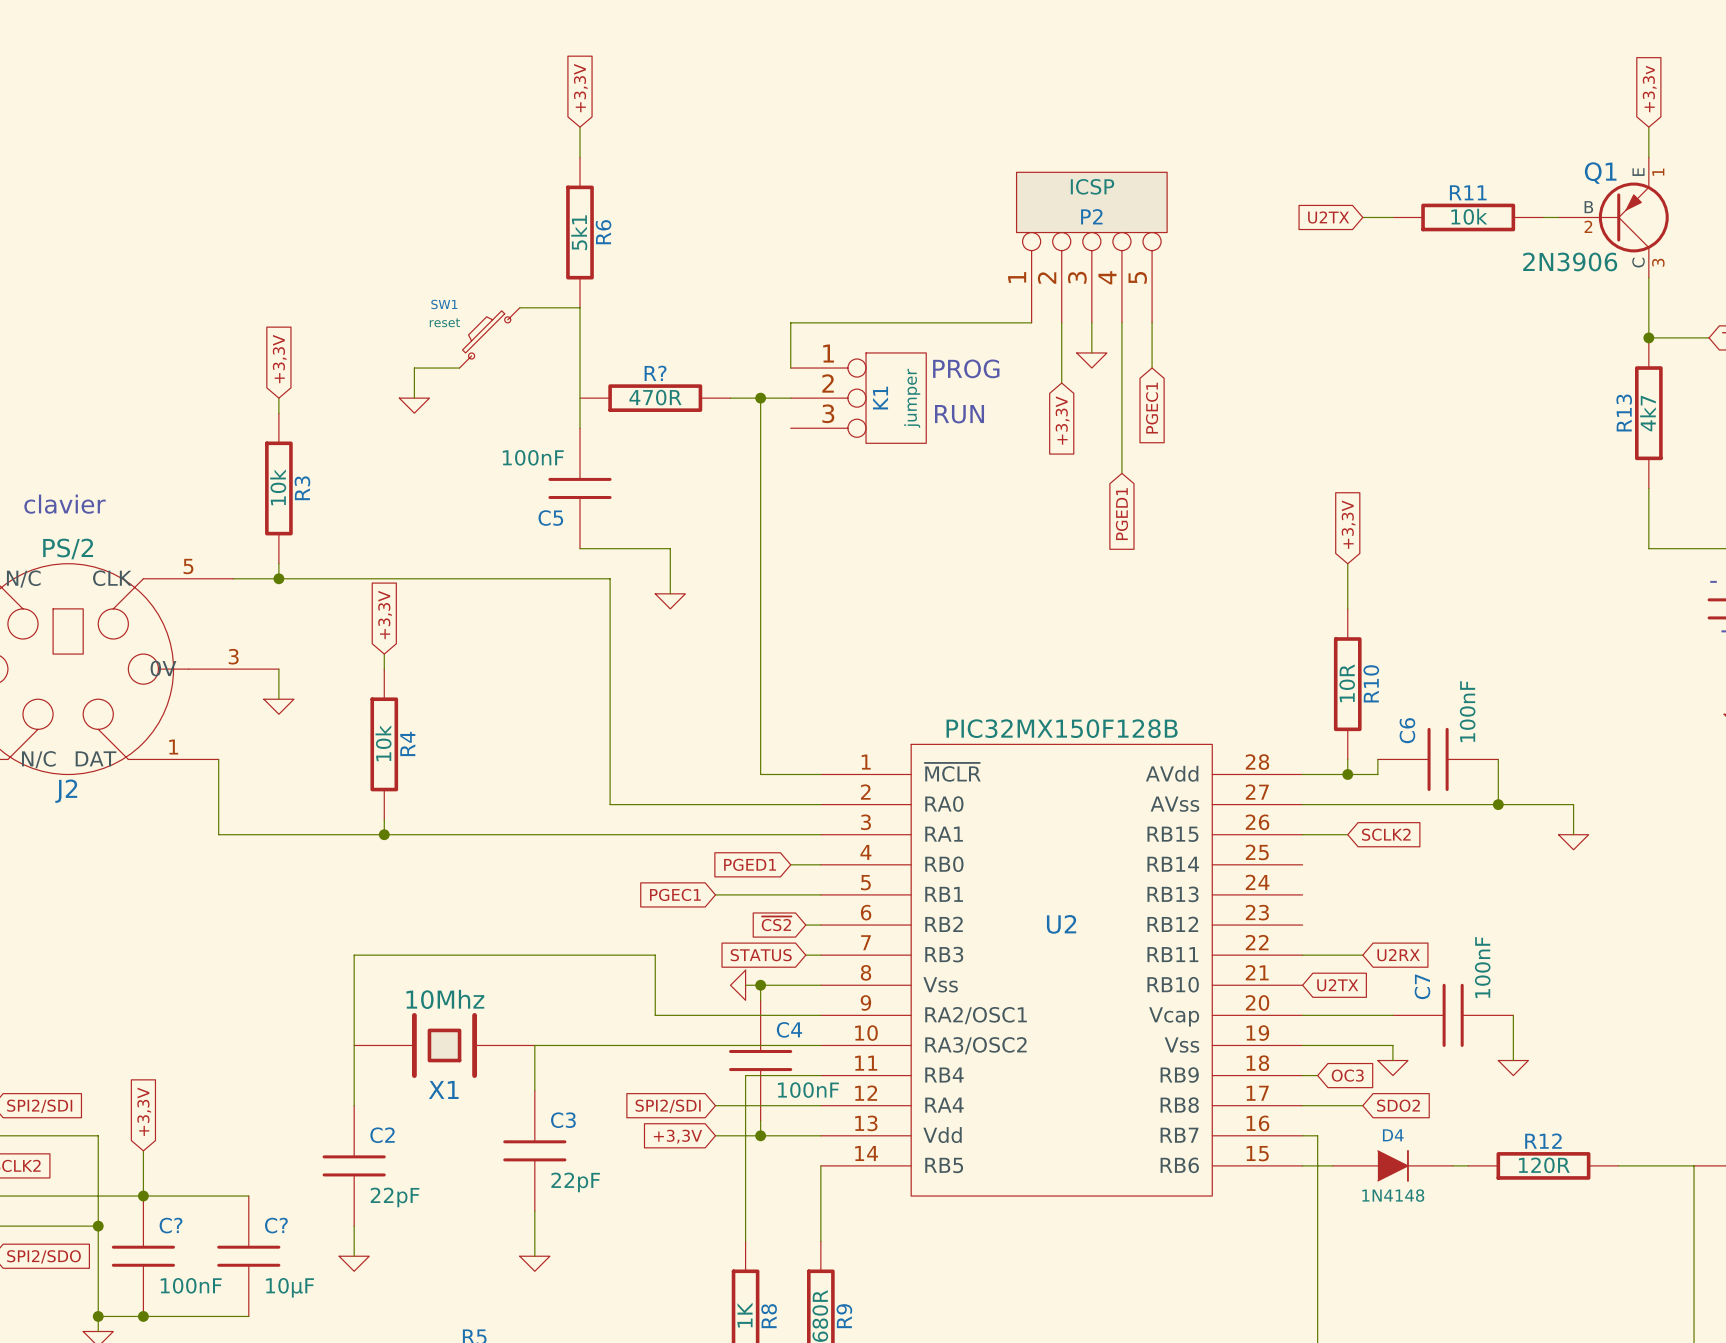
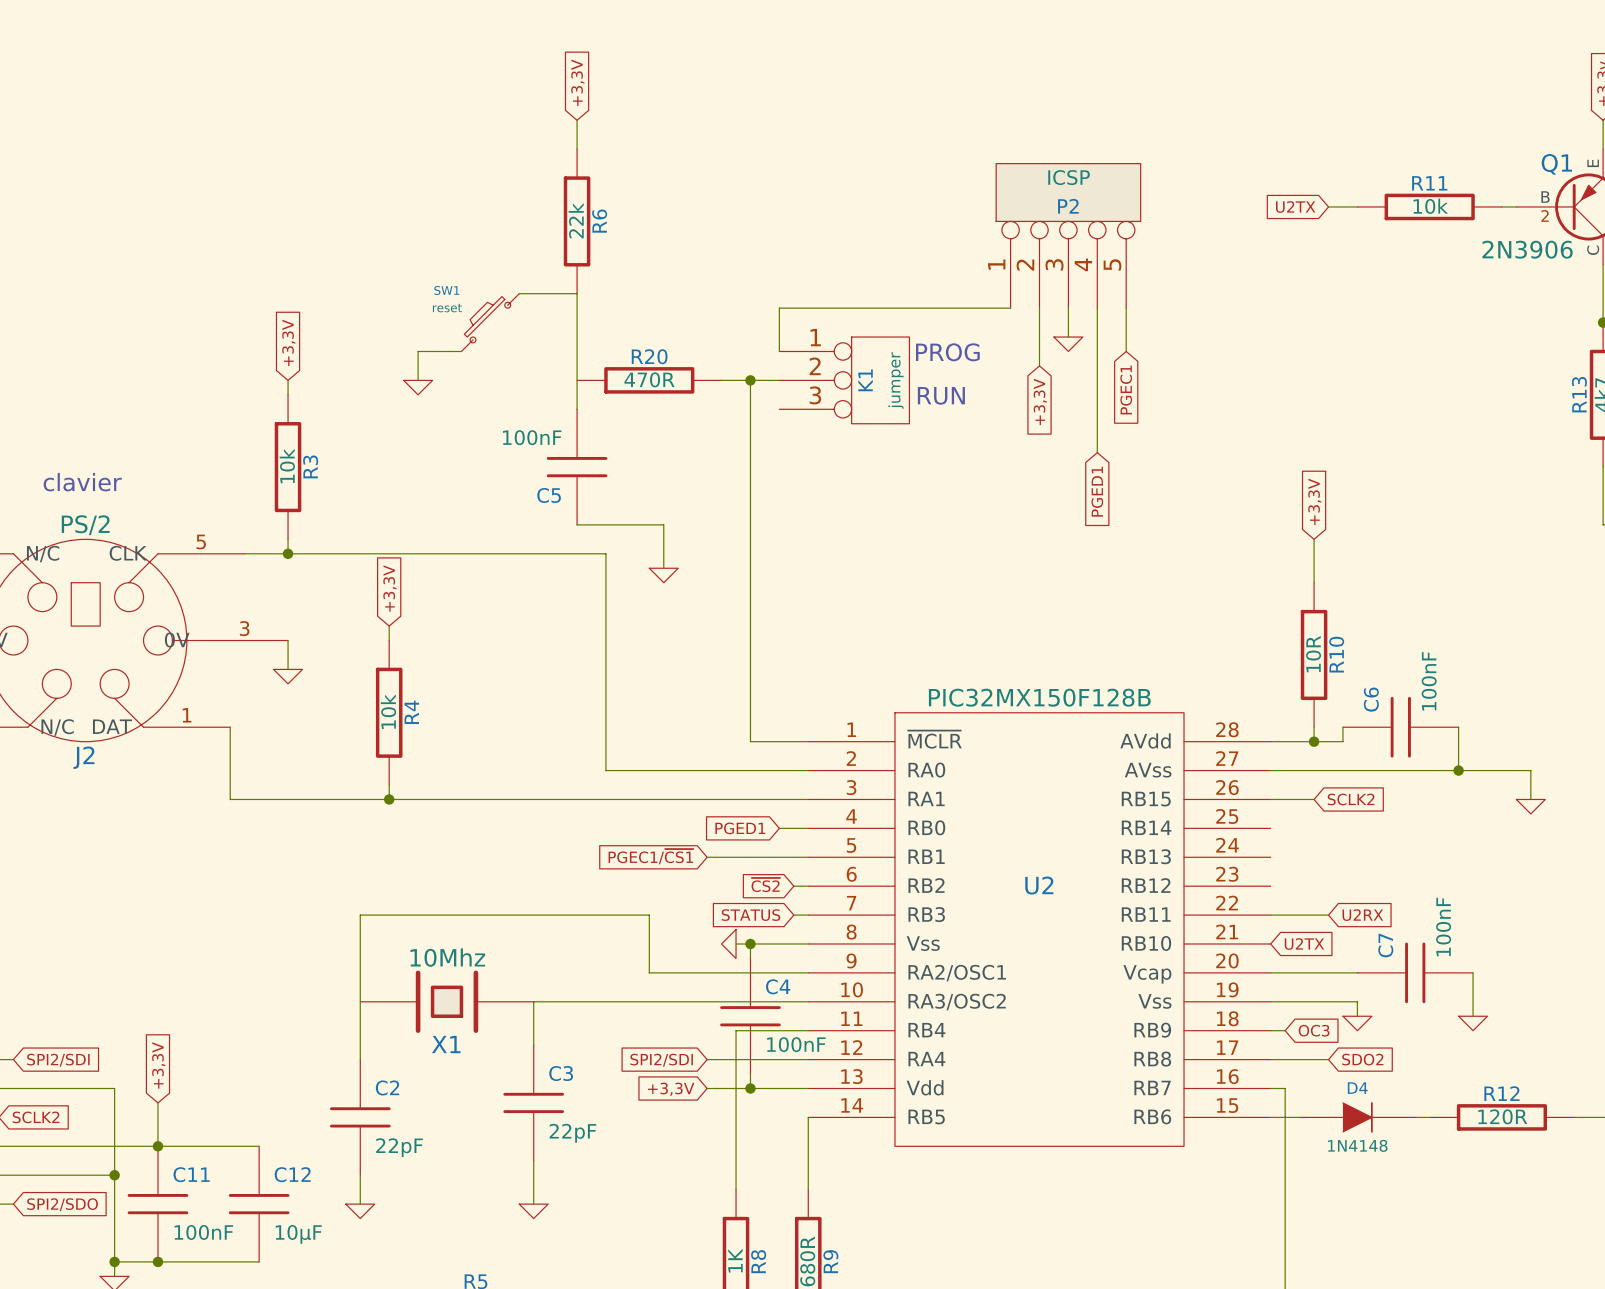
R6 value: 5k1 (579, 232) -> 22k (576, 220)
R? name: R? (655, 373) -> R20 (649, 356)
global label: PGEC1 (675, 894) -> PGEC1/~{CS1} (650, 856)
C? name: C? (171, 1225) -> C11 (191, 1174)
C? name: C? (276, 1225) -> C12 (292, 1174)

